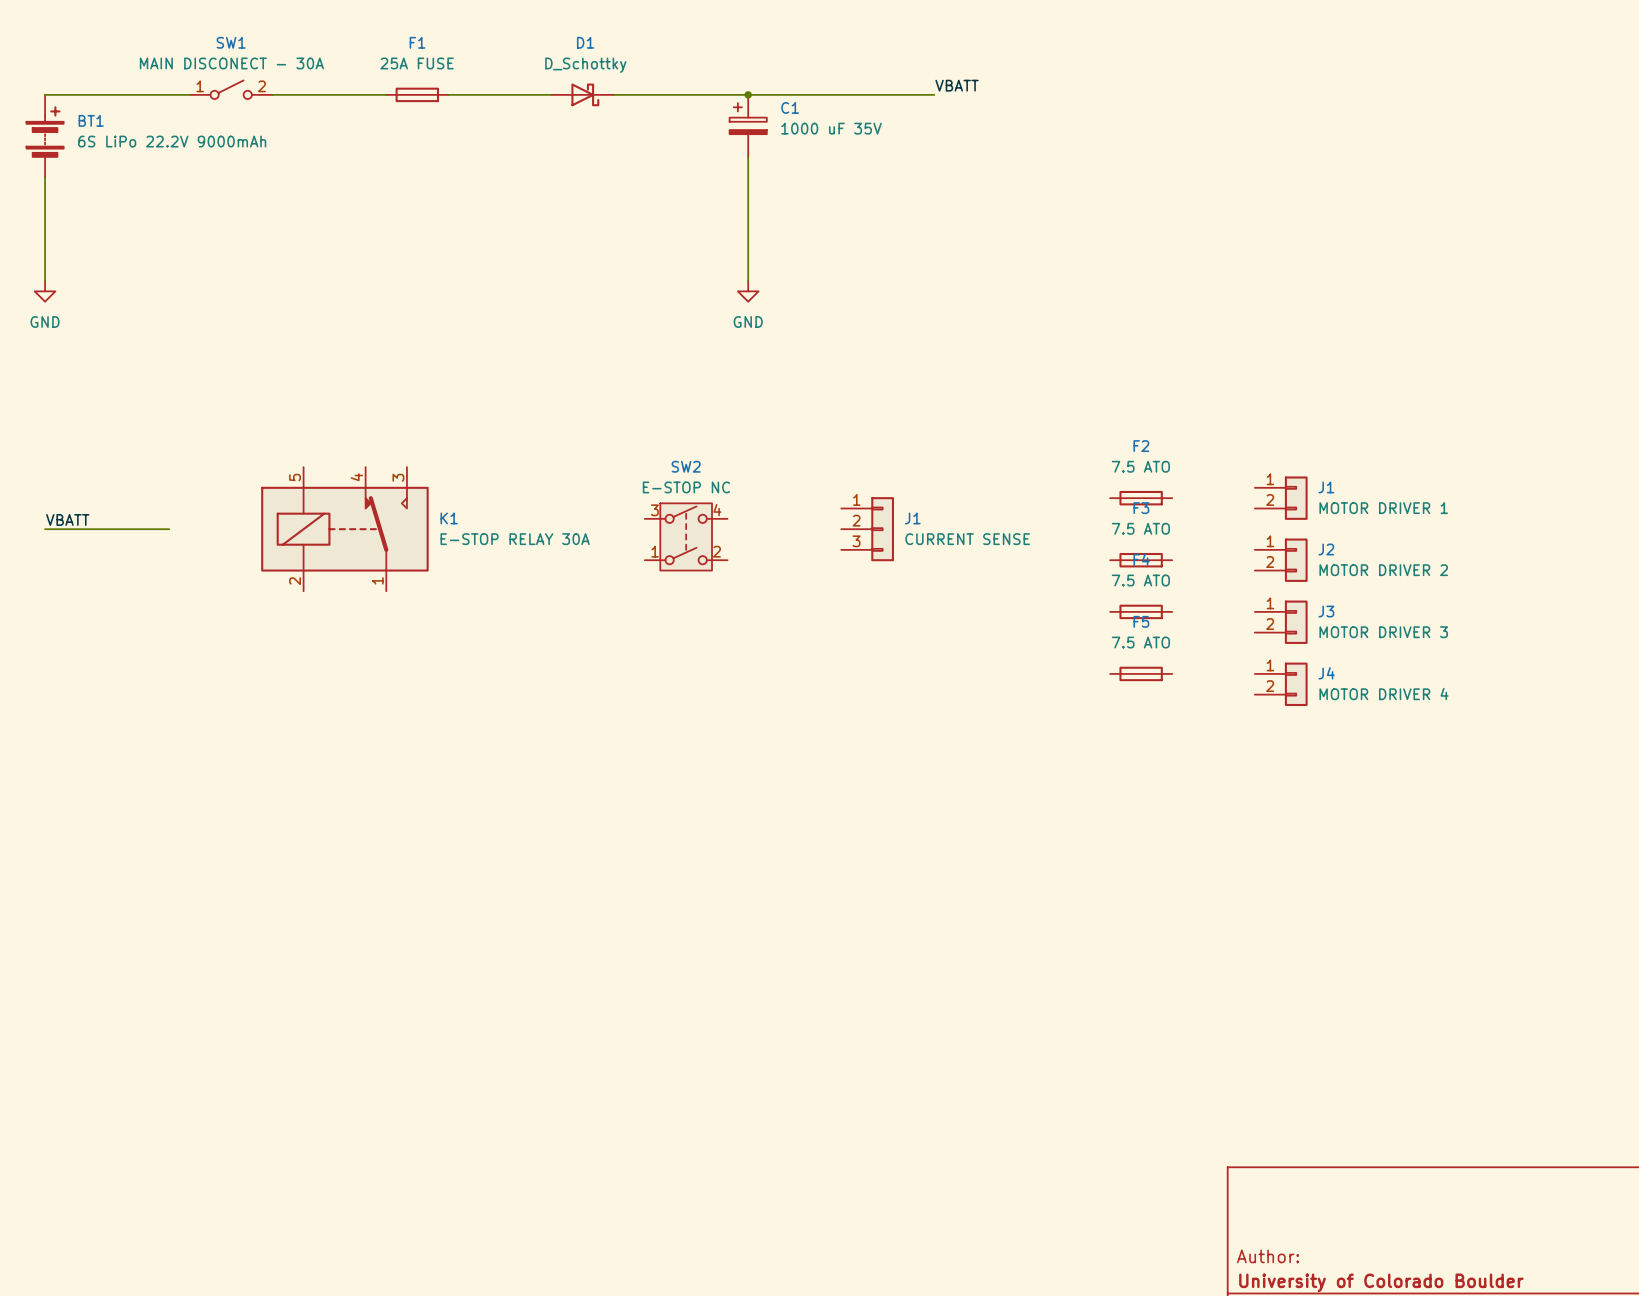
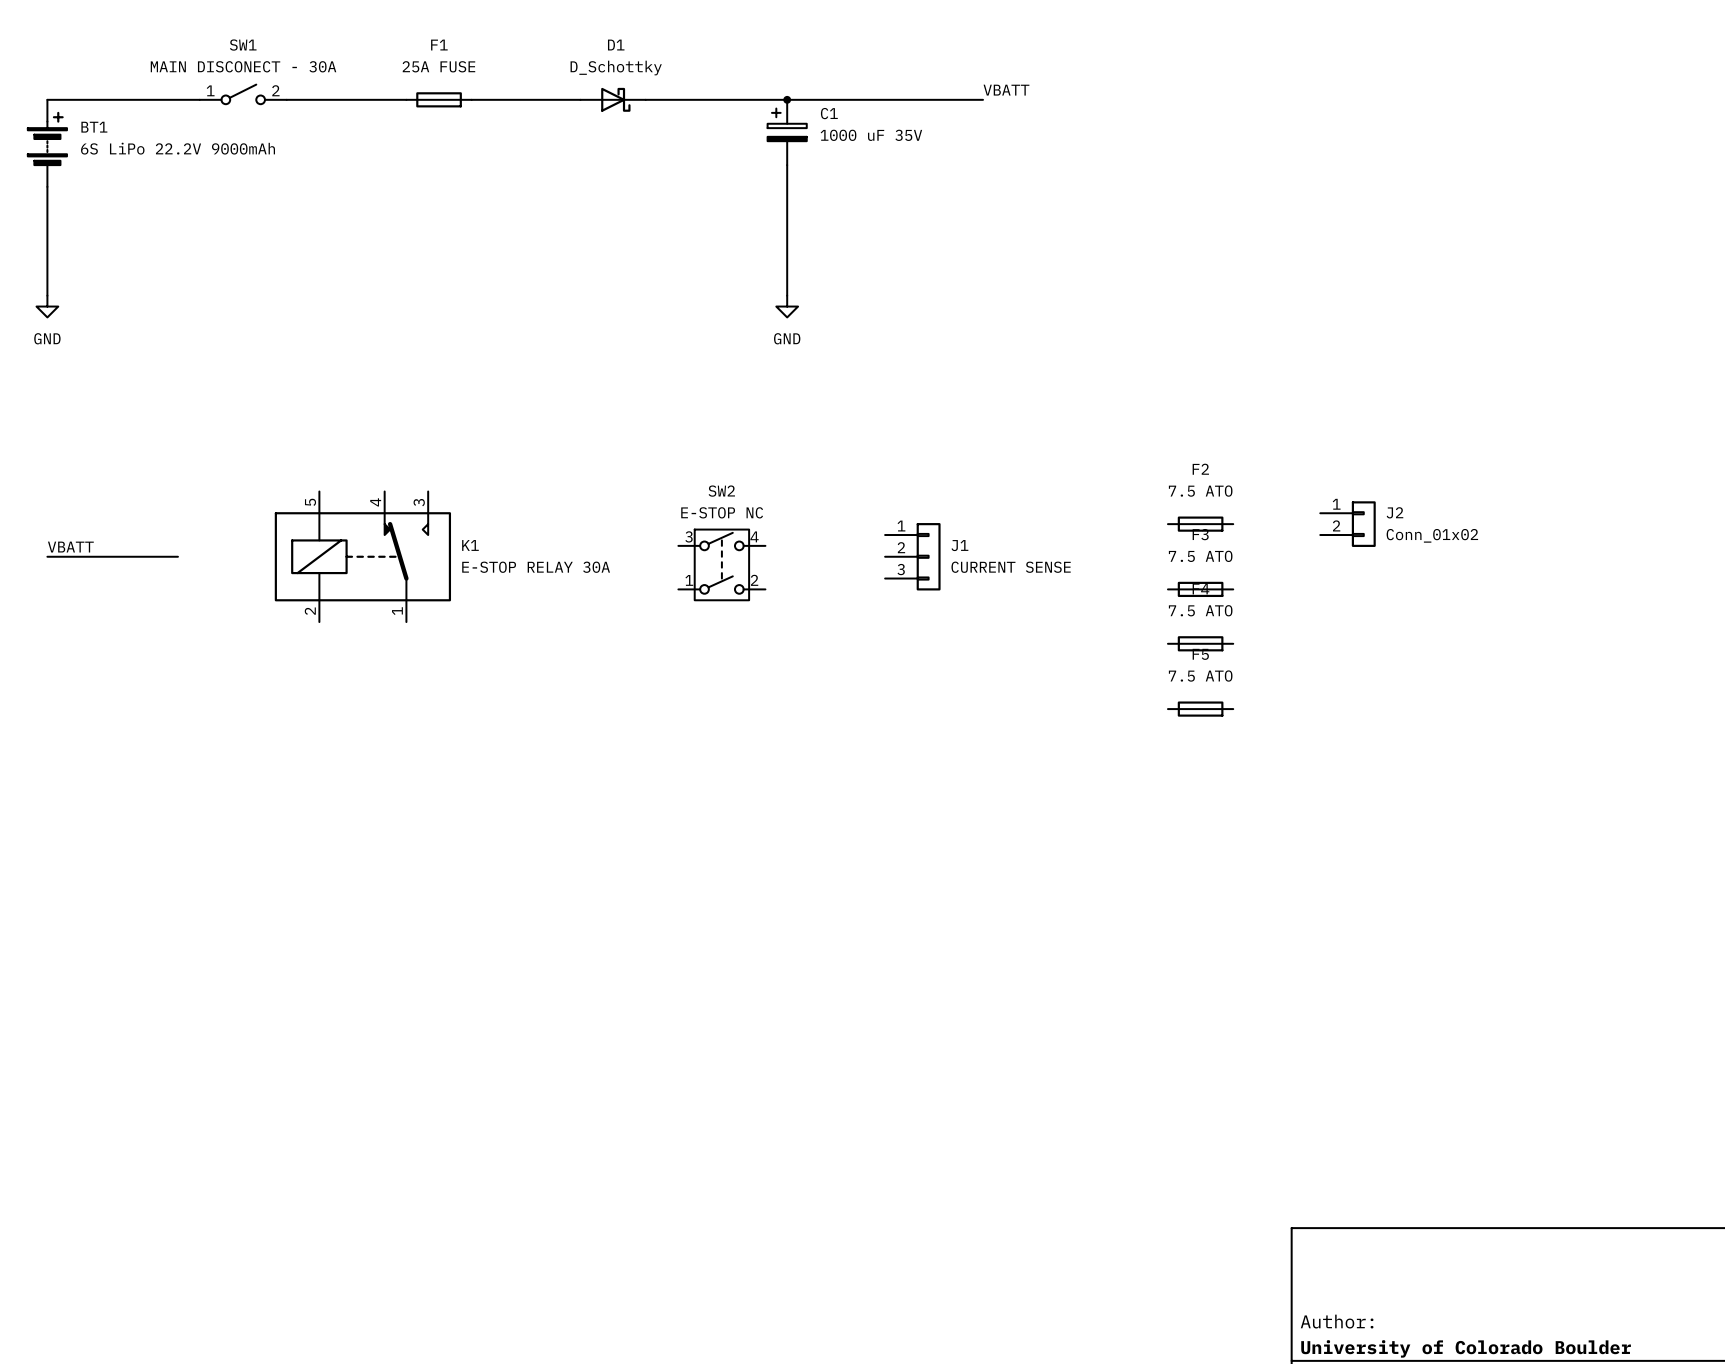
J1 name: J1 (1326, 487) -> J2 (1394, 512)
J1 value: MOTOR DRIVER 1 (1383, 508) -> Conn_01x02 (1432, 535)
J2: MOTOR DRIVER 2 (1281, 560) -> none
J3: MOTOR DRIVER 3 (1281, 622) -> none
J4: MOTOR DRIVER 4 (1281, 684) -> none

